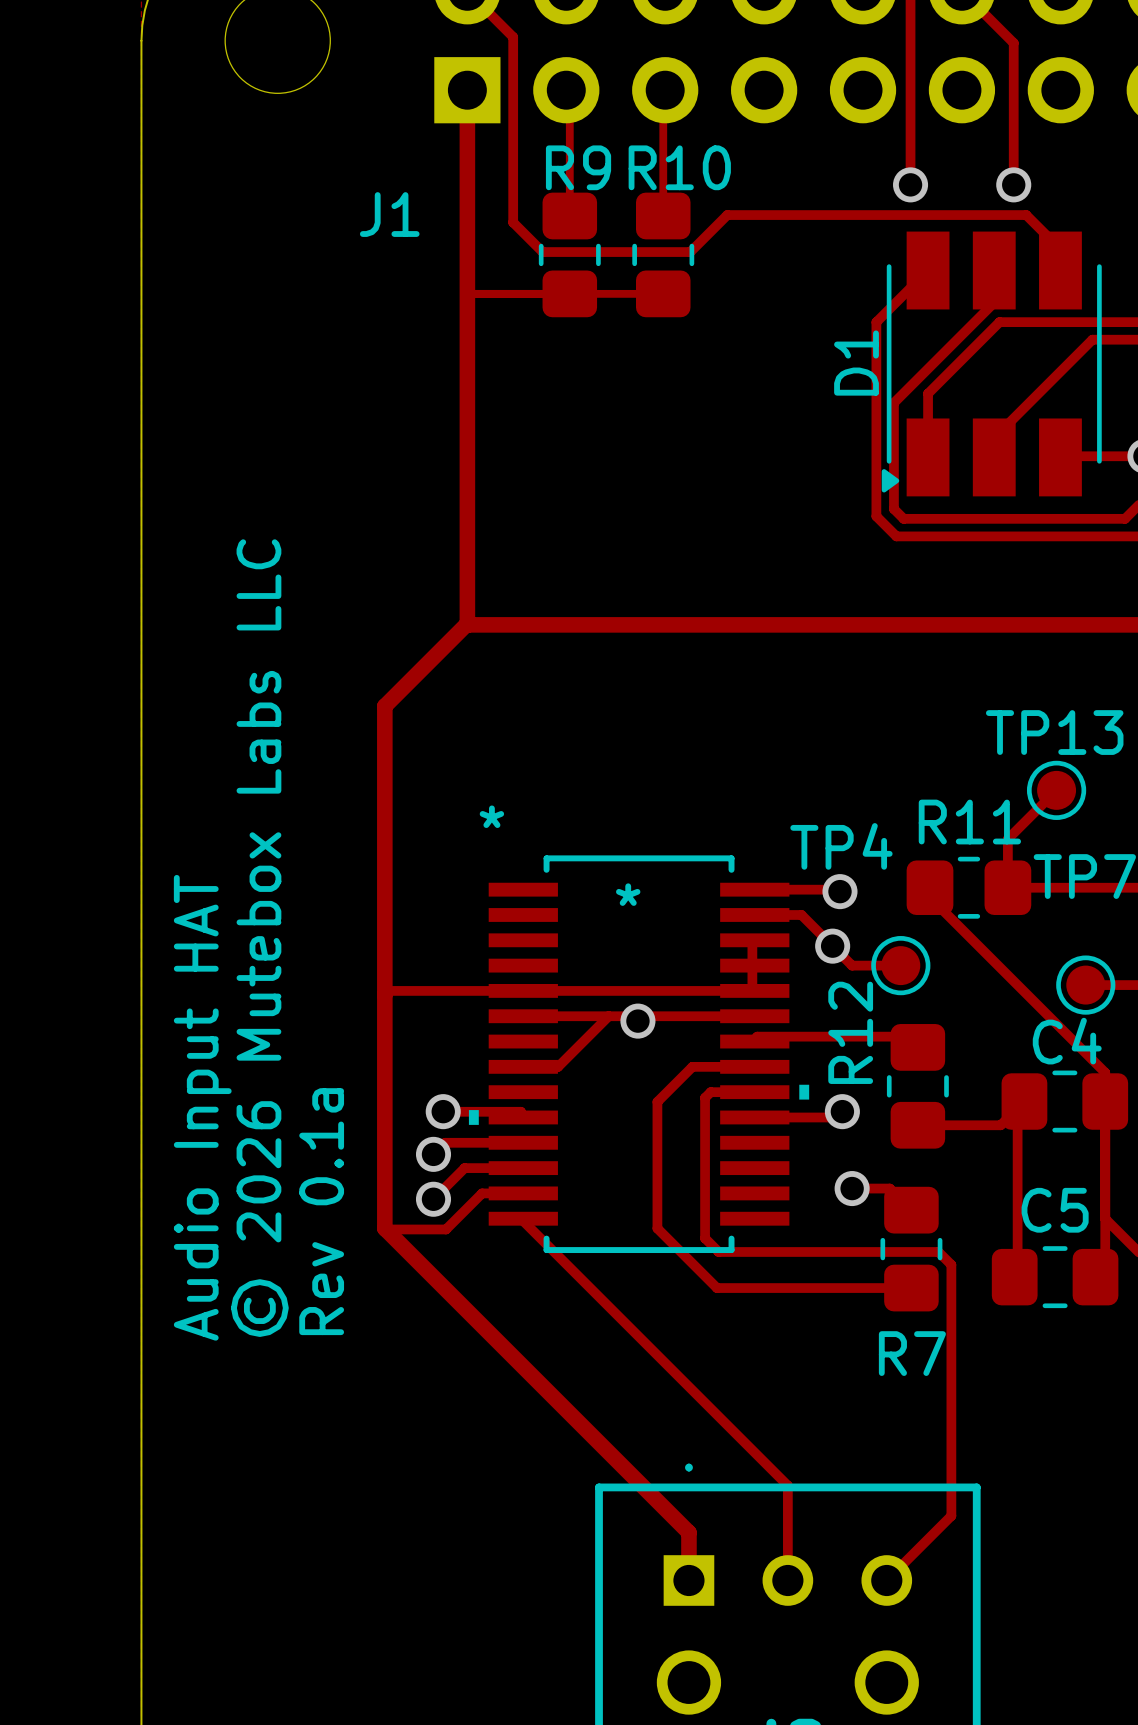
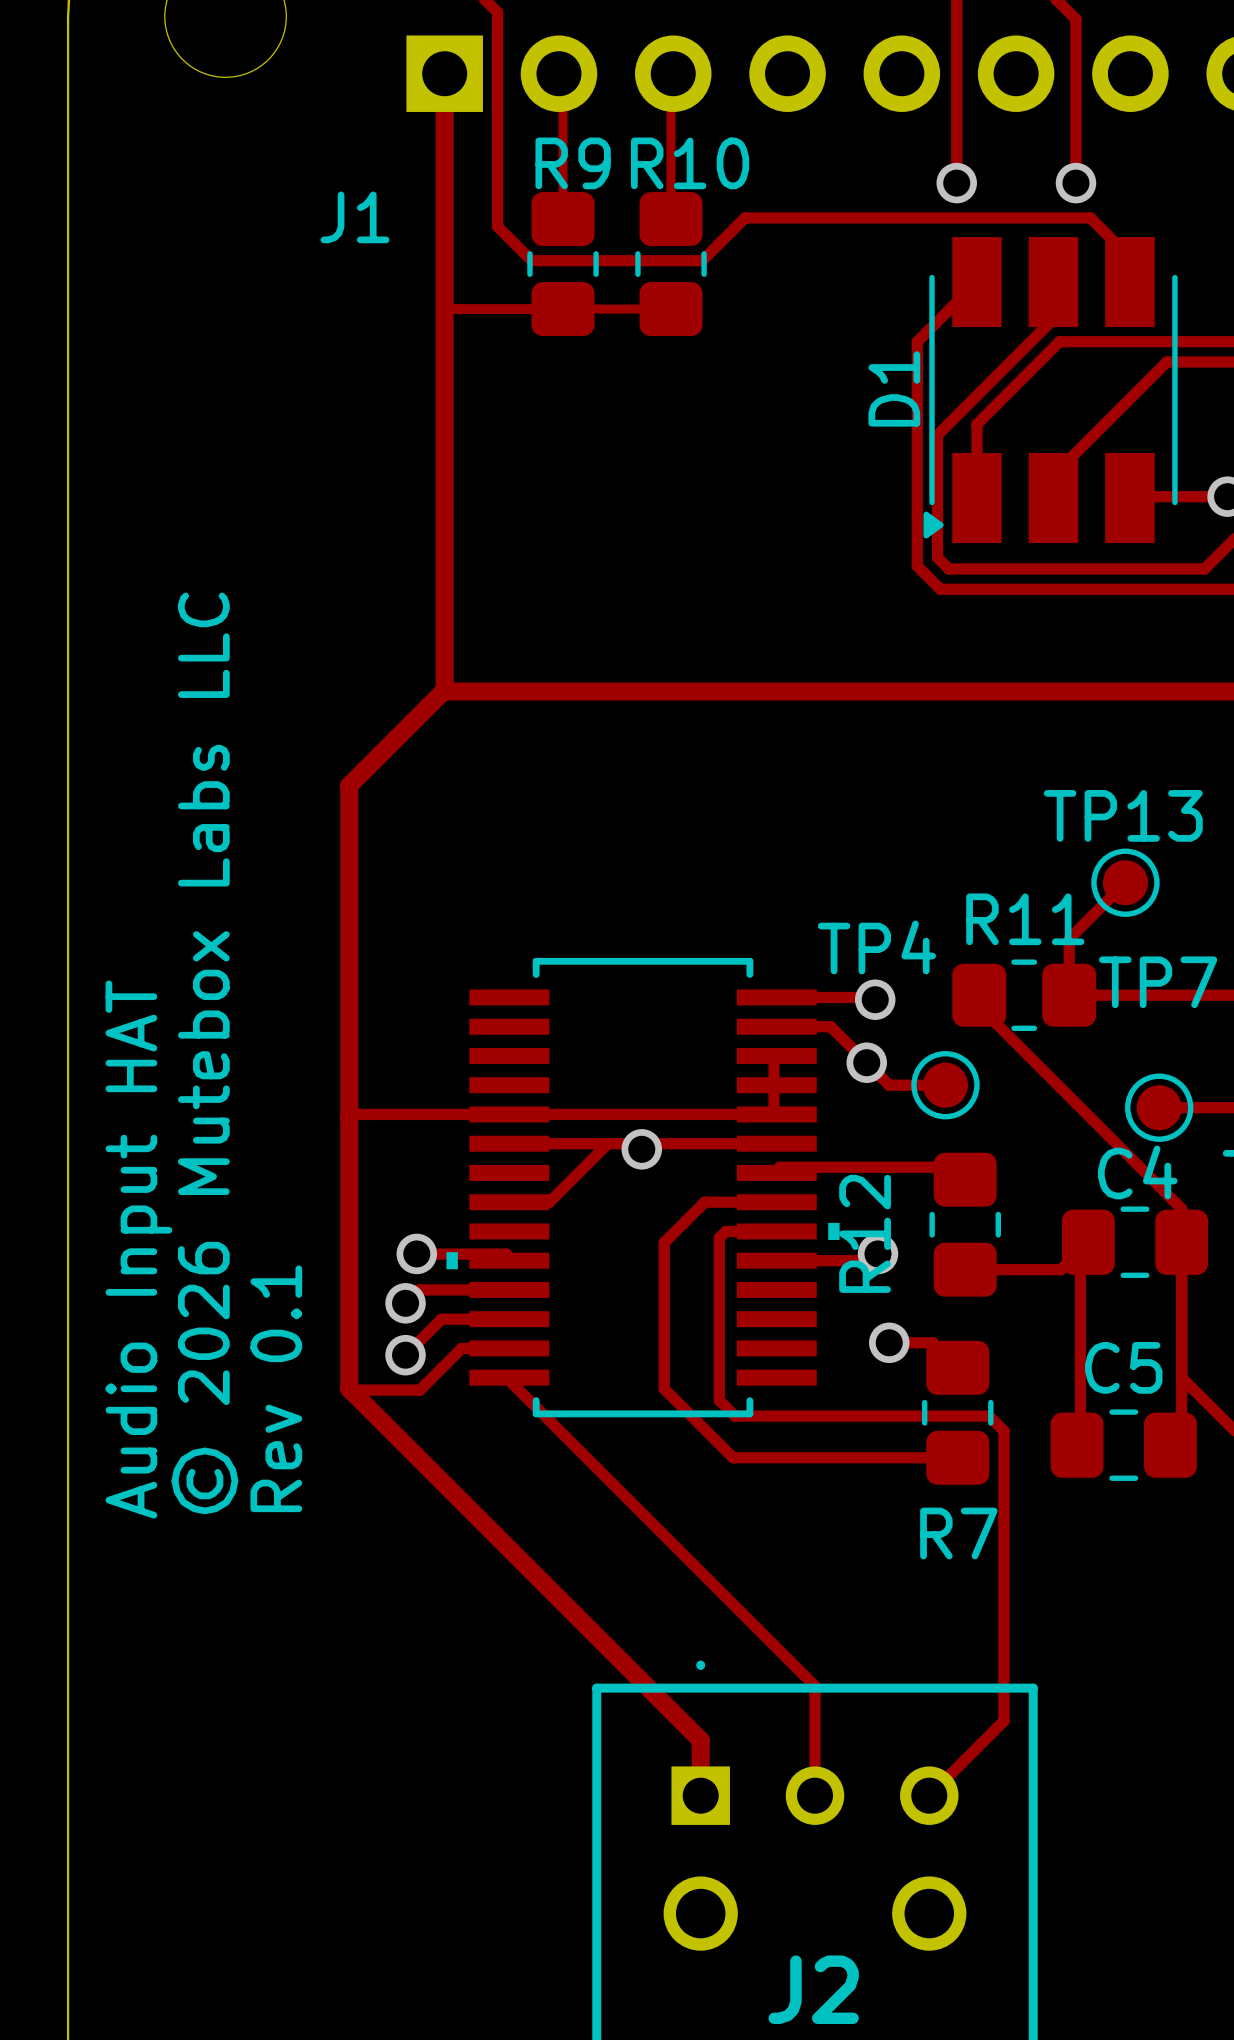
part text: * (491, 816) -> none
part text: * (628, 894) -> none
R12 name position: R12 (850, 1032) -> R12 (865, 1233)
text: Rev 0.1a (321, 1211) -> Rev 0.1 (276, 1388)

